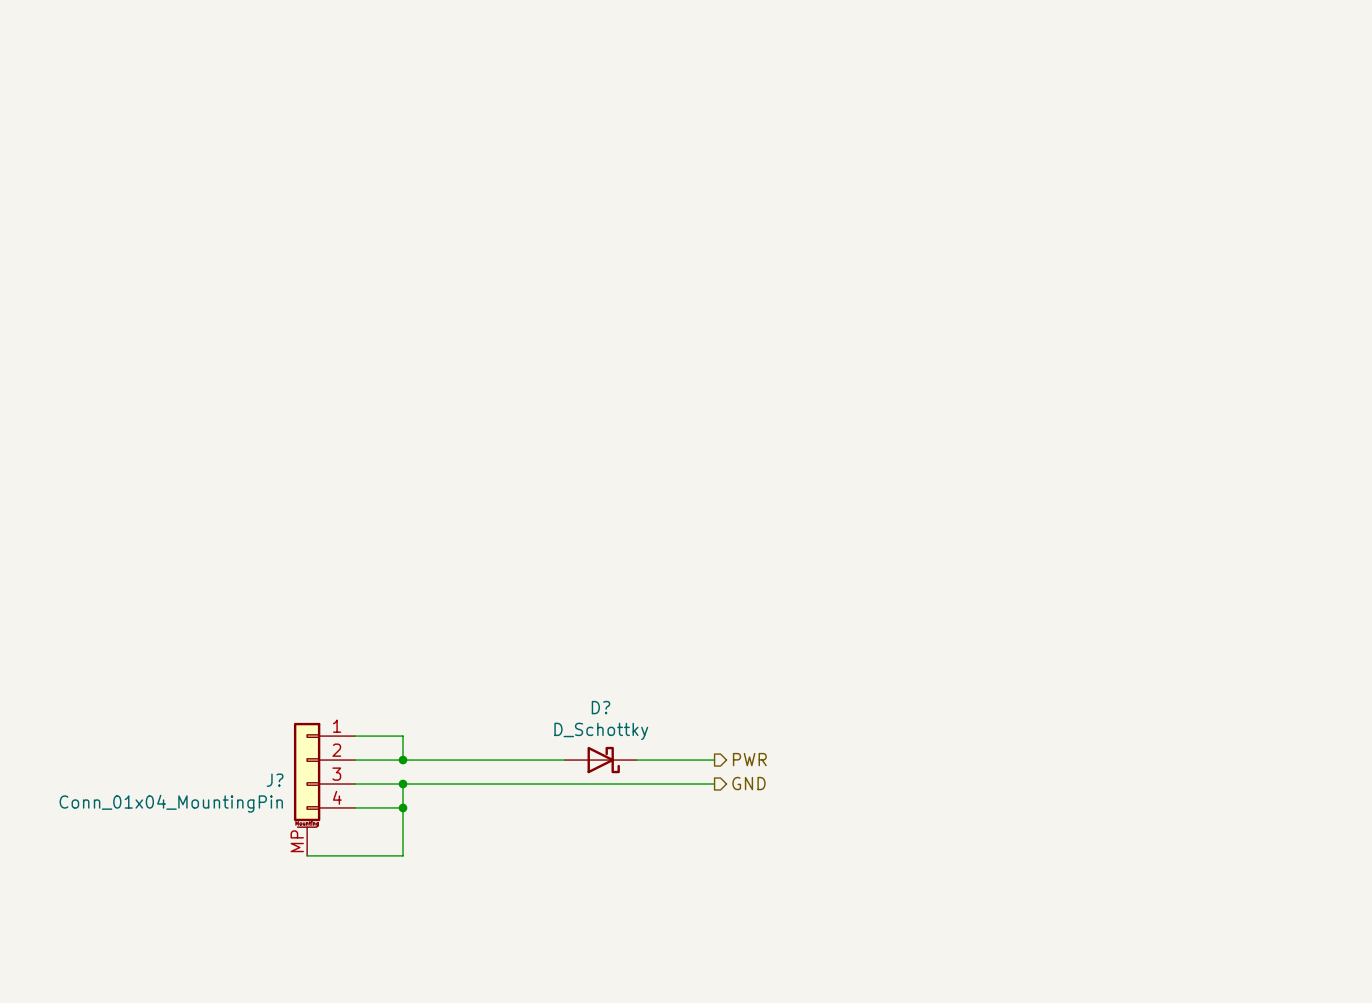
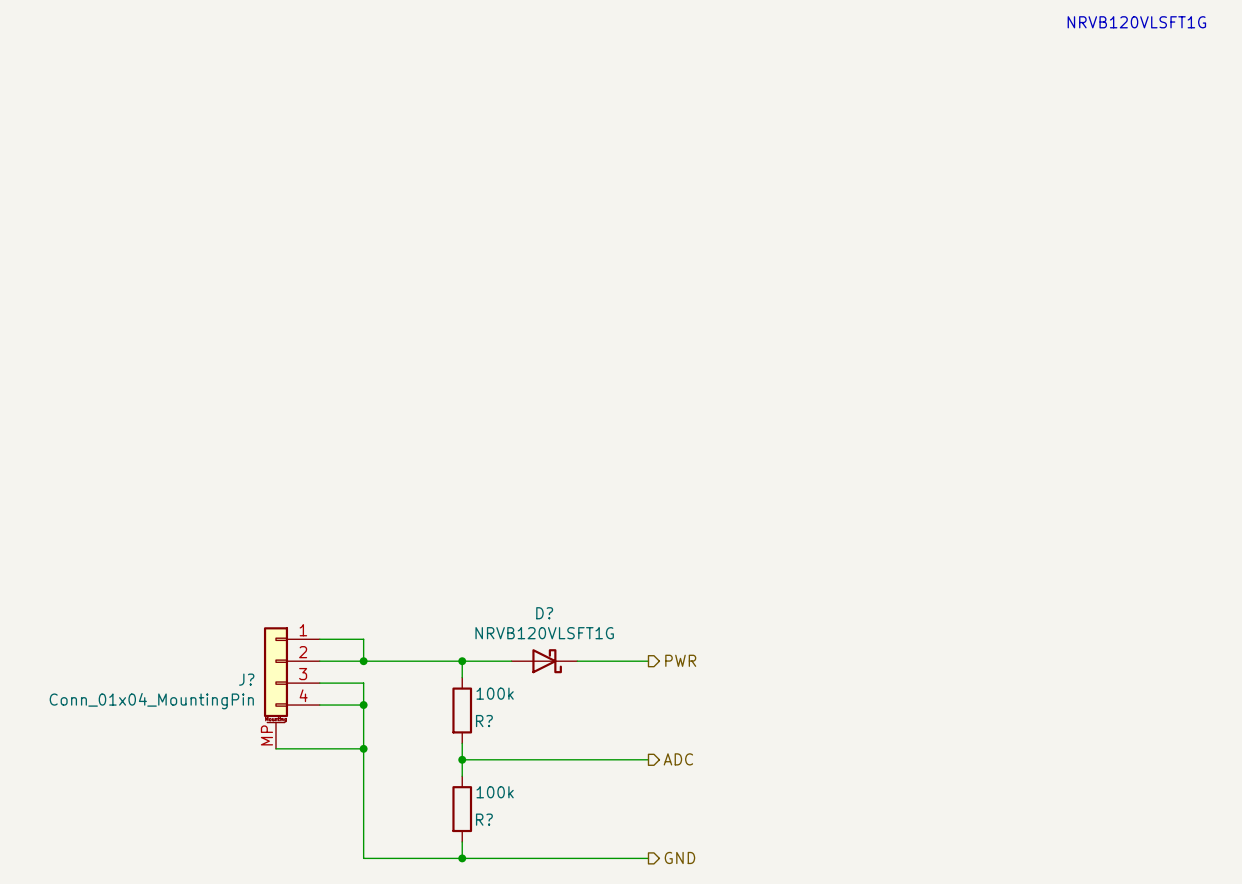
text: none -> NRVB120VLSFT1G (1136, 22)
D? value: D_Schottky (601, 731) -> NRVB120VLSFT1G (544, 633)
wire: none -> (462, 661) (462, 677)
junction: none -> (462, 661)
hierarchical label position: GND (748, 783) -> GND (679, 857)
wire: (402, 784) (714, 784) -> none
junction: (402, 784) -> none
R?: none -> 100k (462, 710)
wire: none -> (462, 743) (462, 776)
wire: none -> (363, 748) (363, 858) (648, 858)
junction: none -> (363, 748)
wire: none -> (462, 759) (648, 759)
junction: none -> (462, 759)
hierarchical label: none -> ADC (678, 759)
R?: none -> 100k (462, 809)
wire: none -> (462, 841) (462, 858)
junction: none -> (462, 858)

